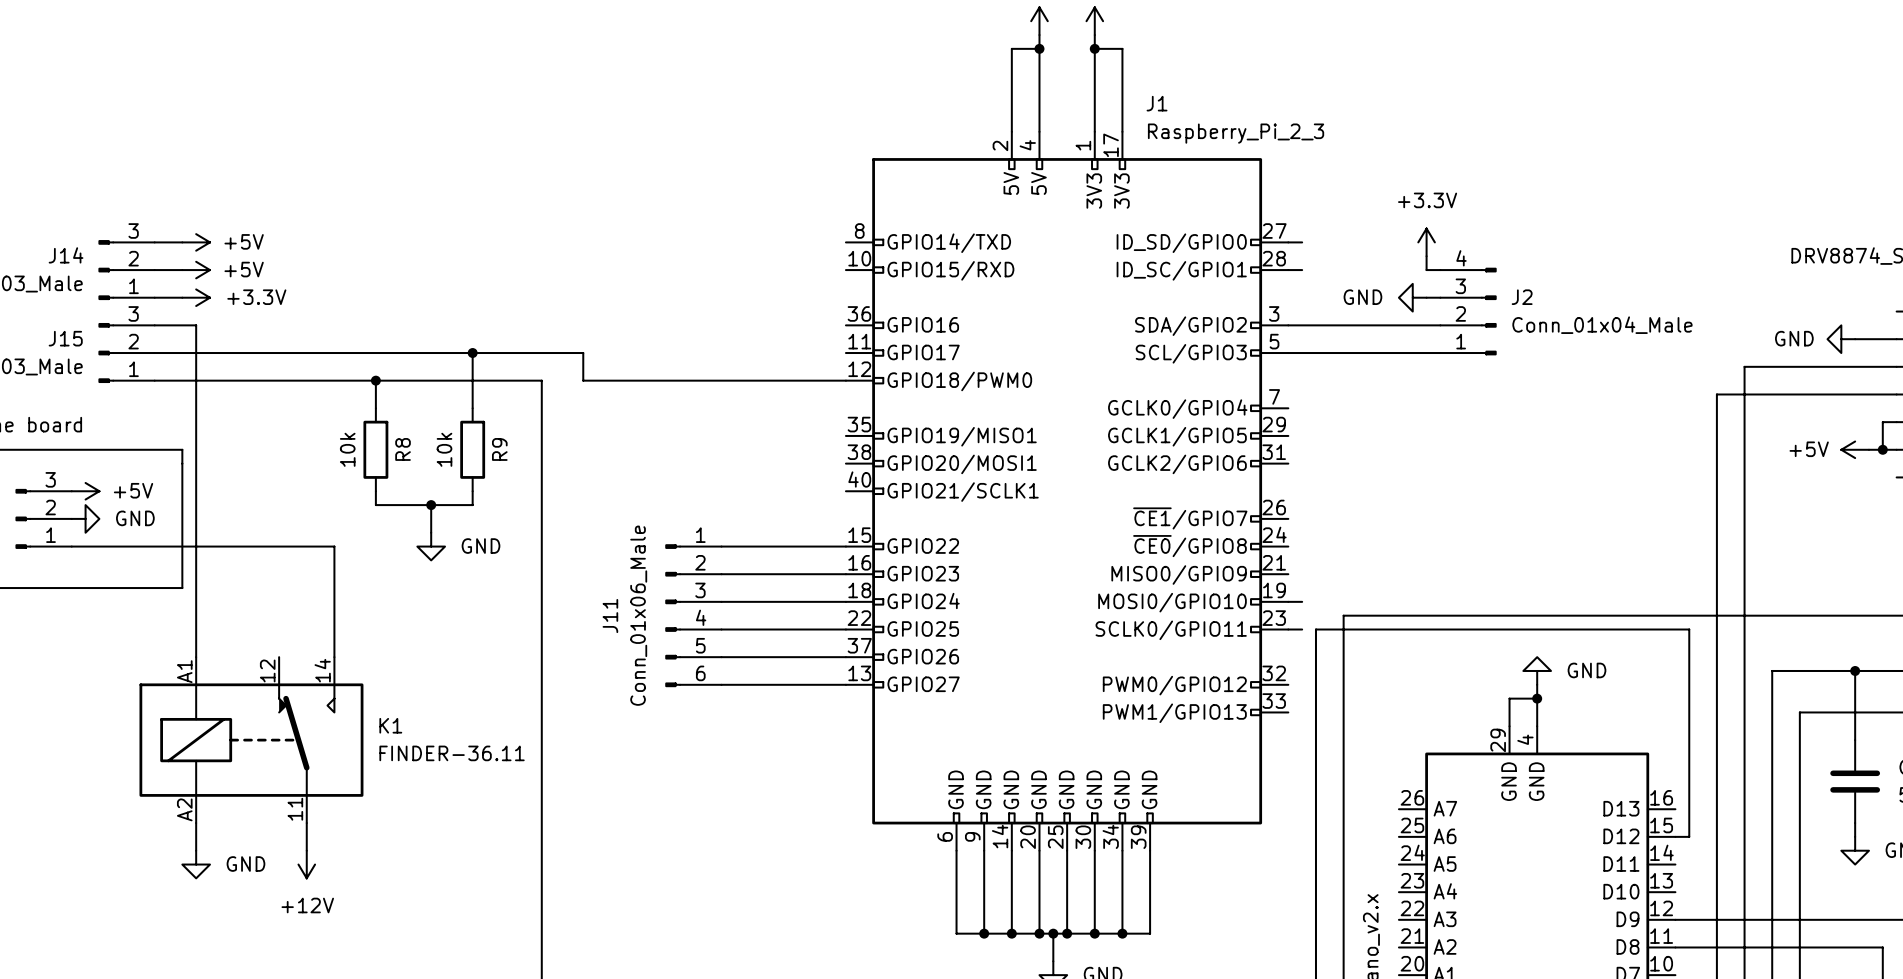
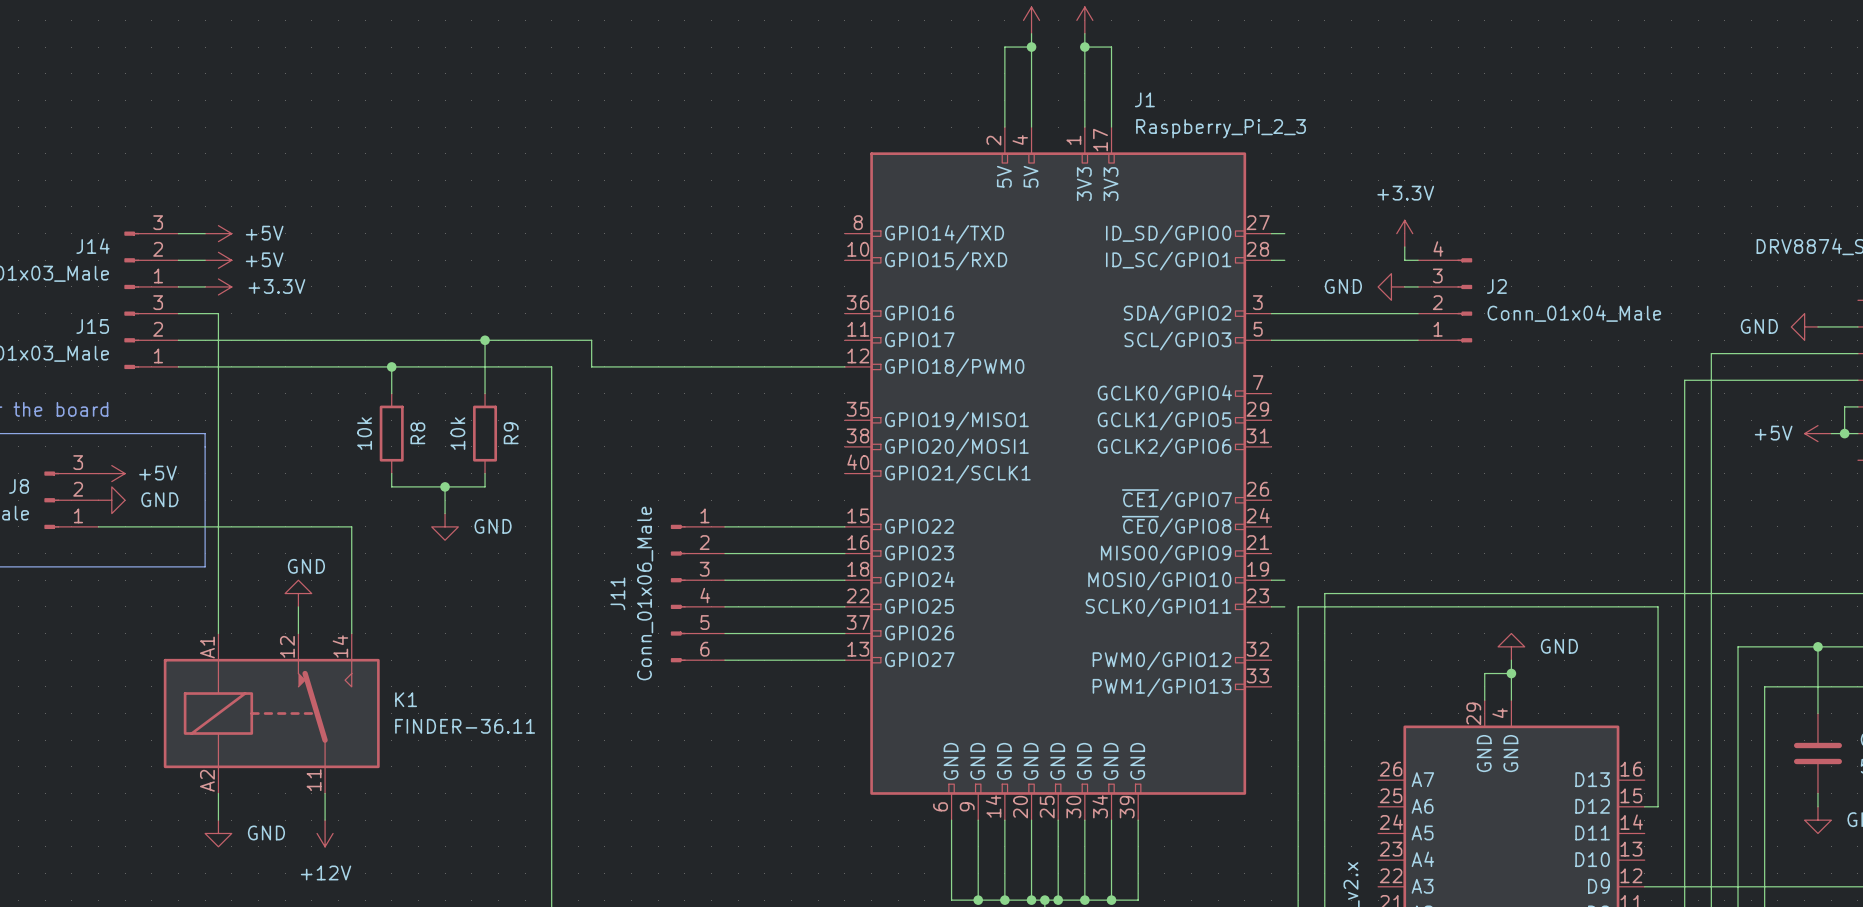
power symbol: none -> GND (298, 593)
wire: none -> (298, 606) (298, 633)

